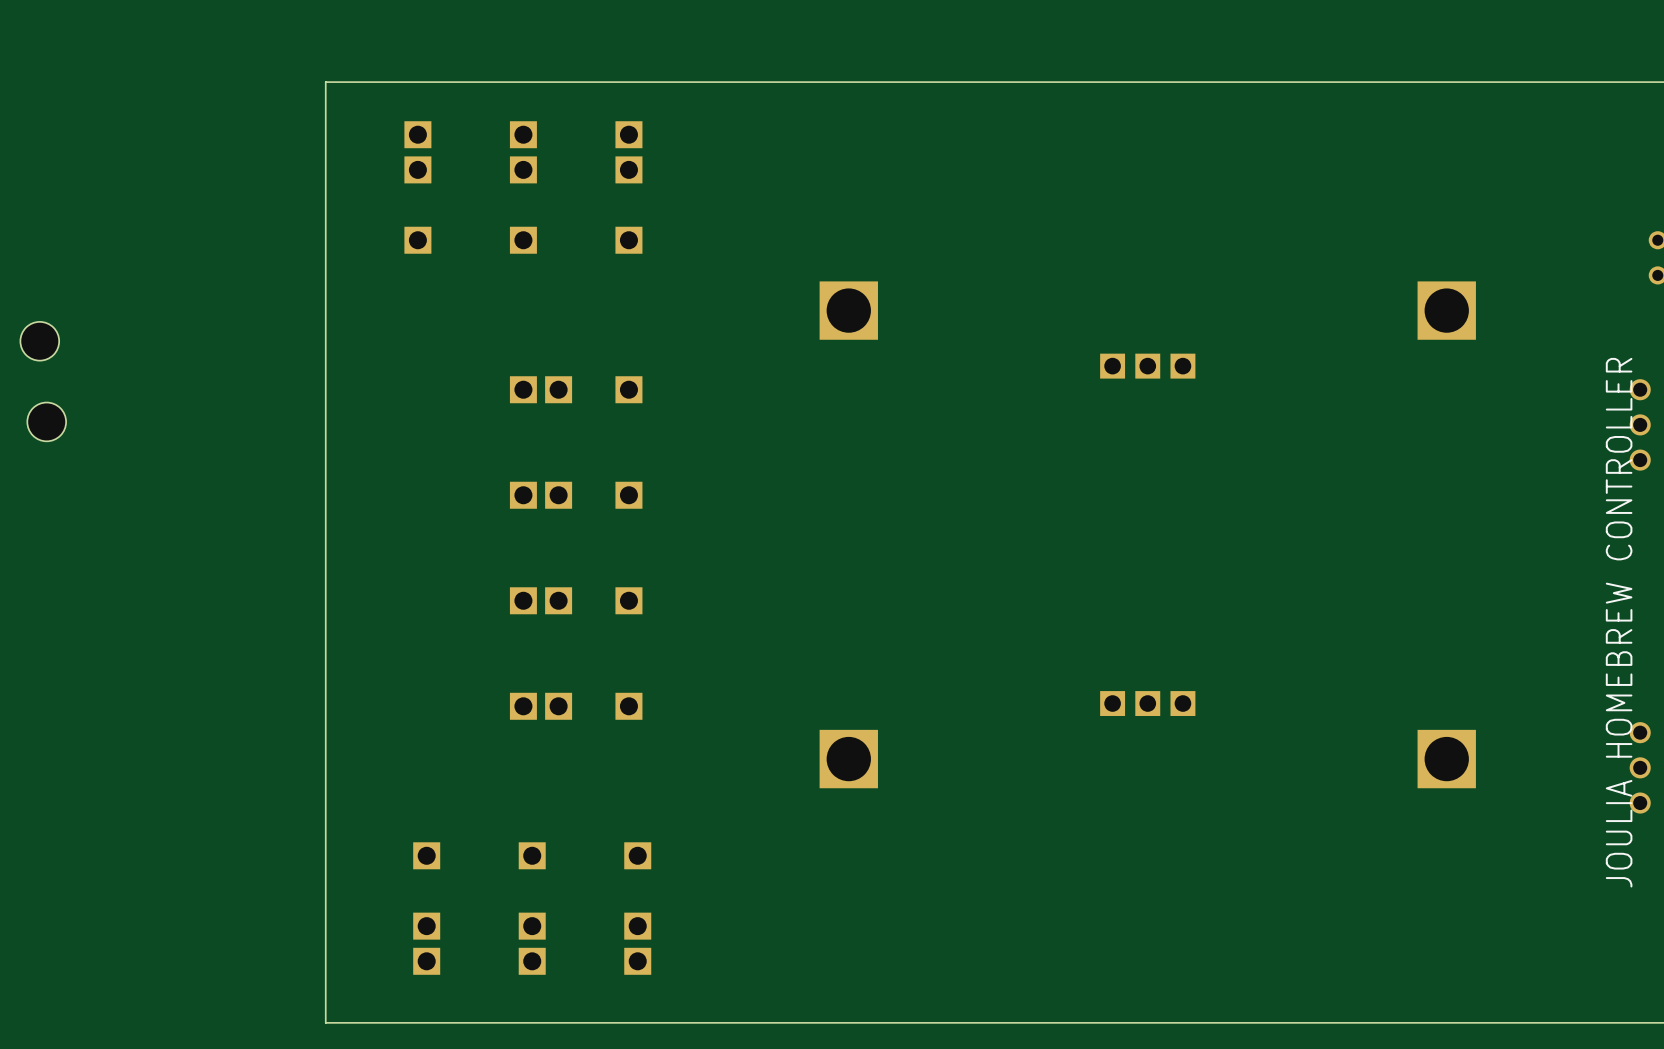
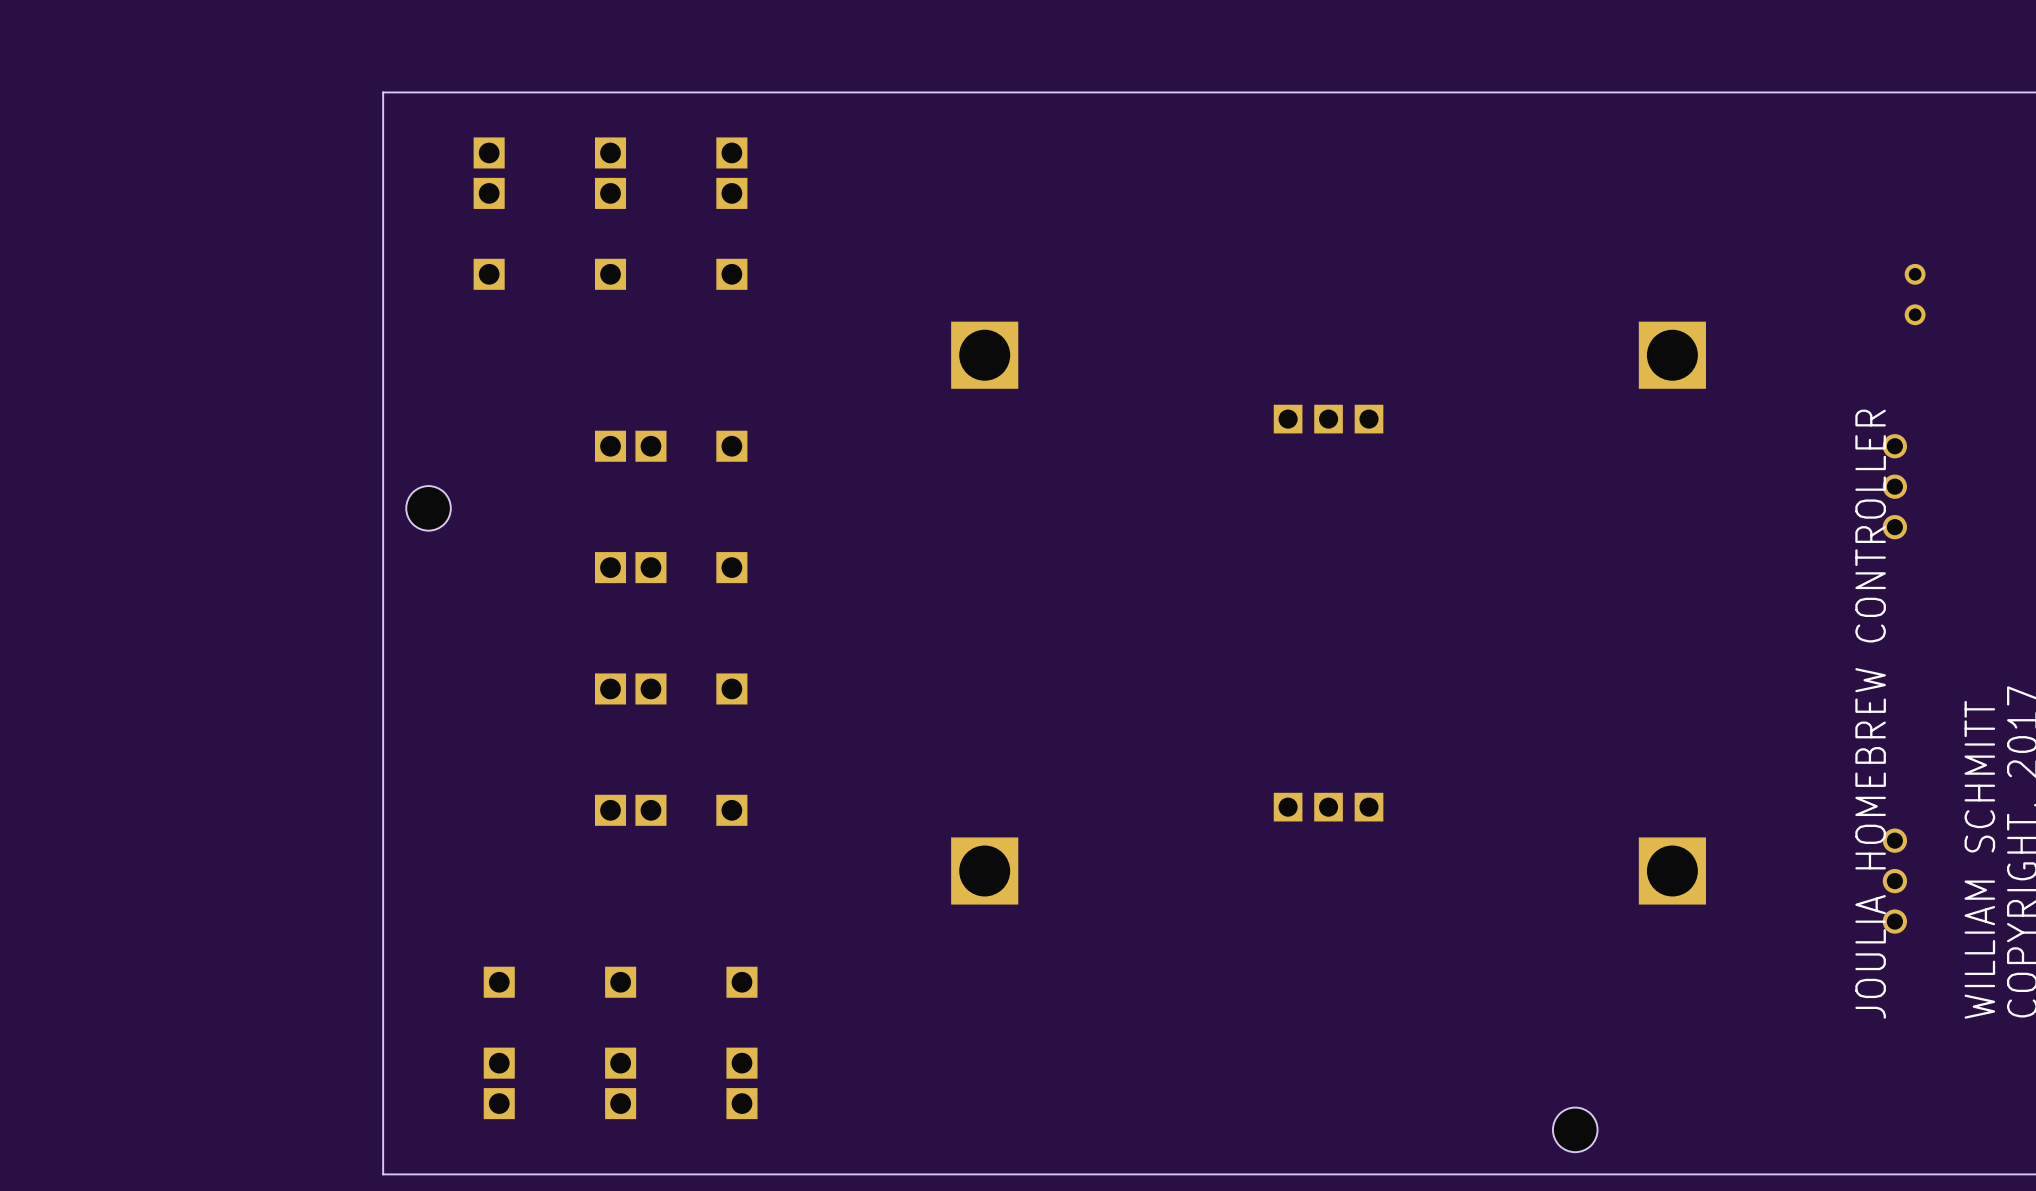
hole: (39, 341) -> none
hole: (46, 421) -> none
hole: none -> (428, 508)
hole: none -> (1575, 1129)

